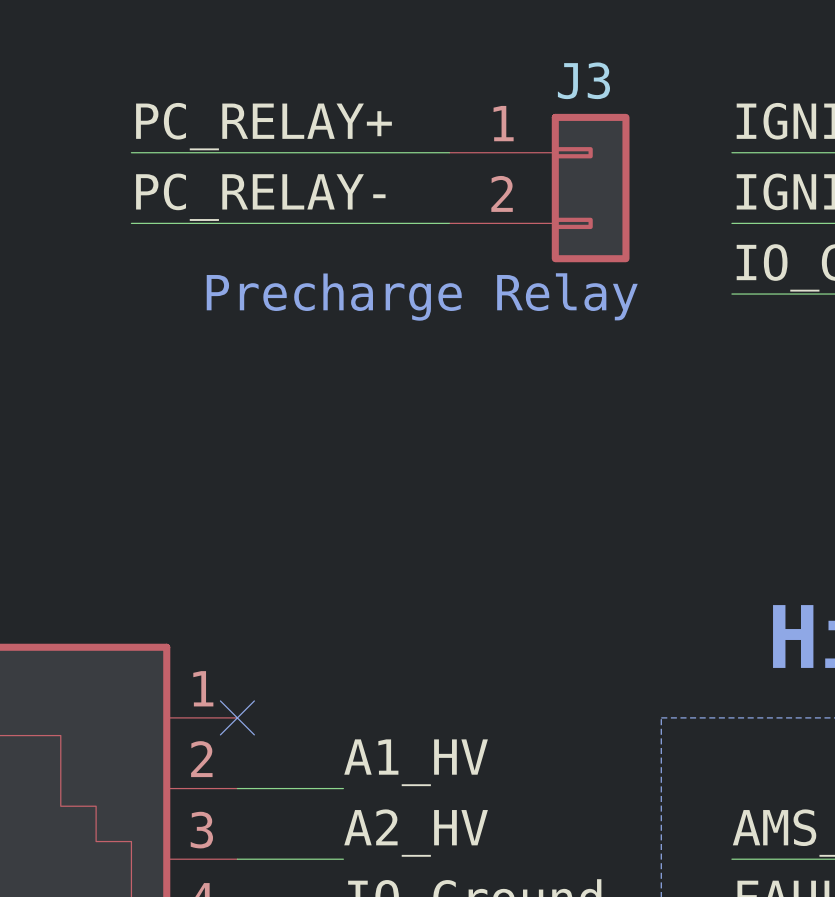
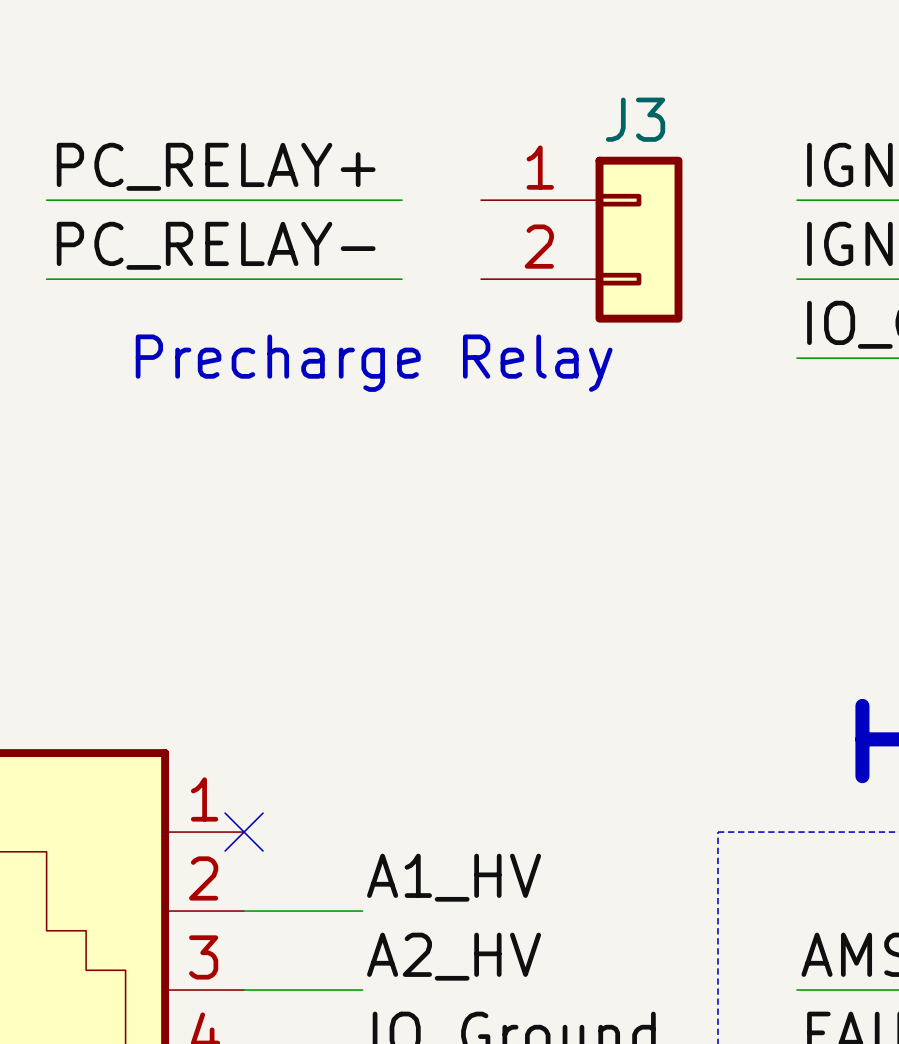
label position: PC_RELAY+ (263, 126) -> PC_RELAY+ (216, 166)
wire: (378, 152) (449, 152) -> (46, 200) (125, 200)
label position: PC_RELAY- (260, 197) -> PC_RELAY- (216, 245)
wire: (378, 223) (449, 223) -> (46, 279) (125, 279)
text position: Precharge Relay (422, 296) -> Precharge Relay (374, 363)

